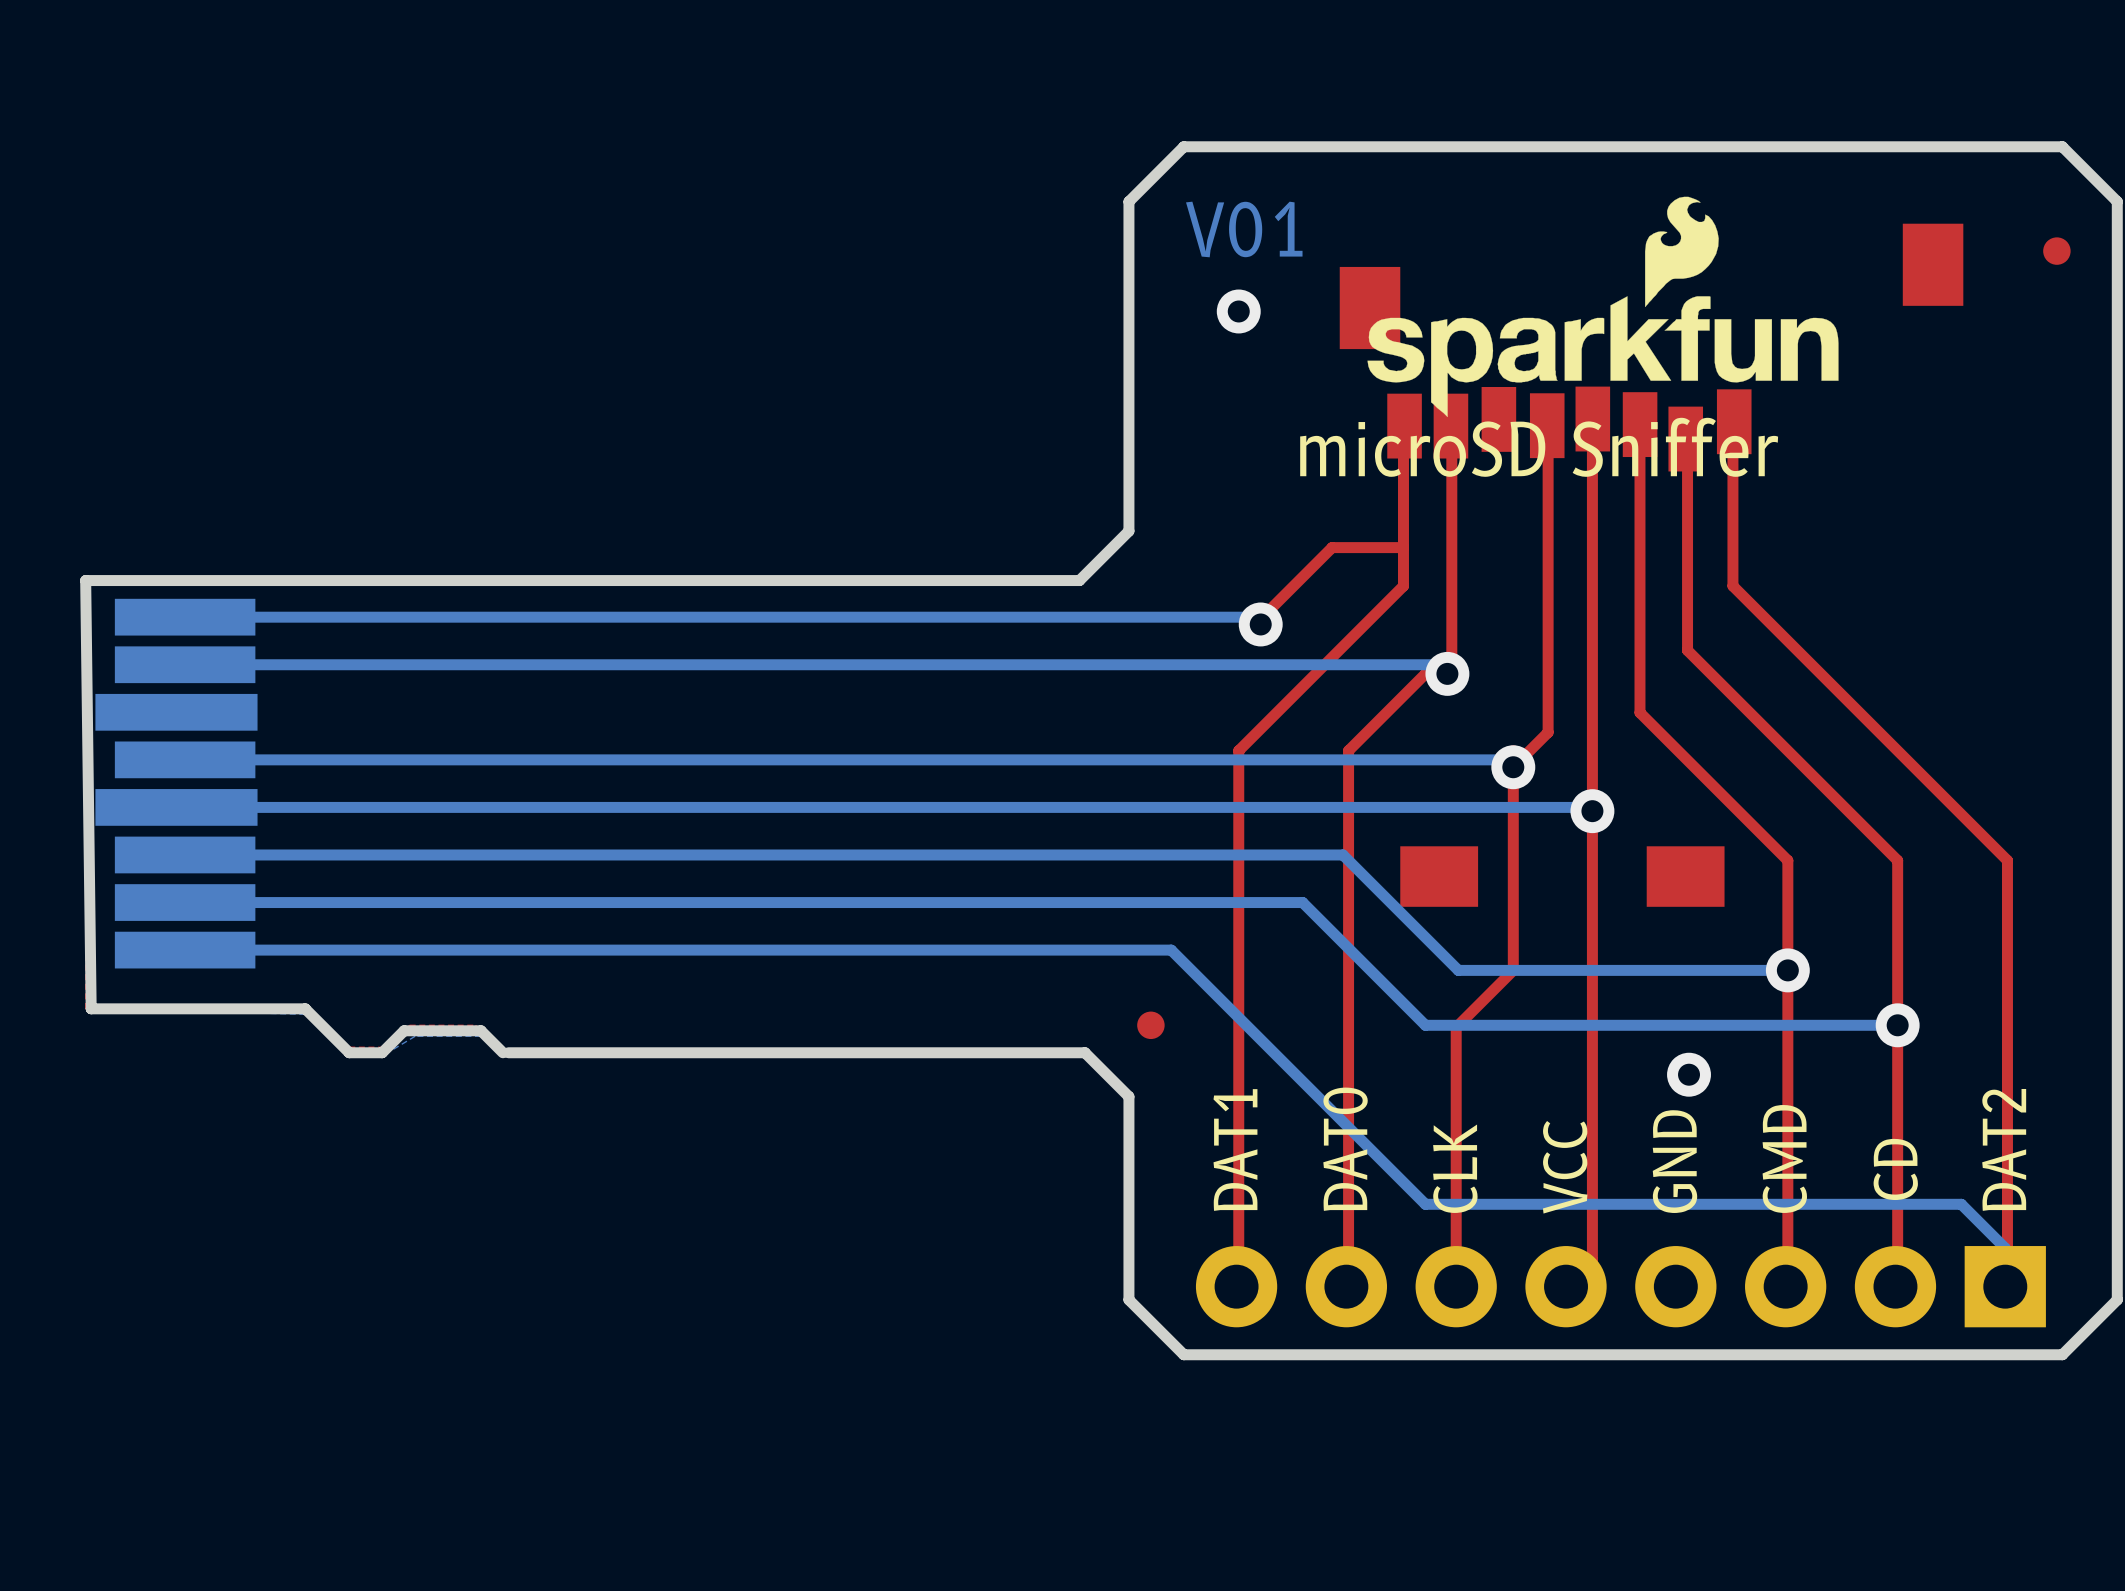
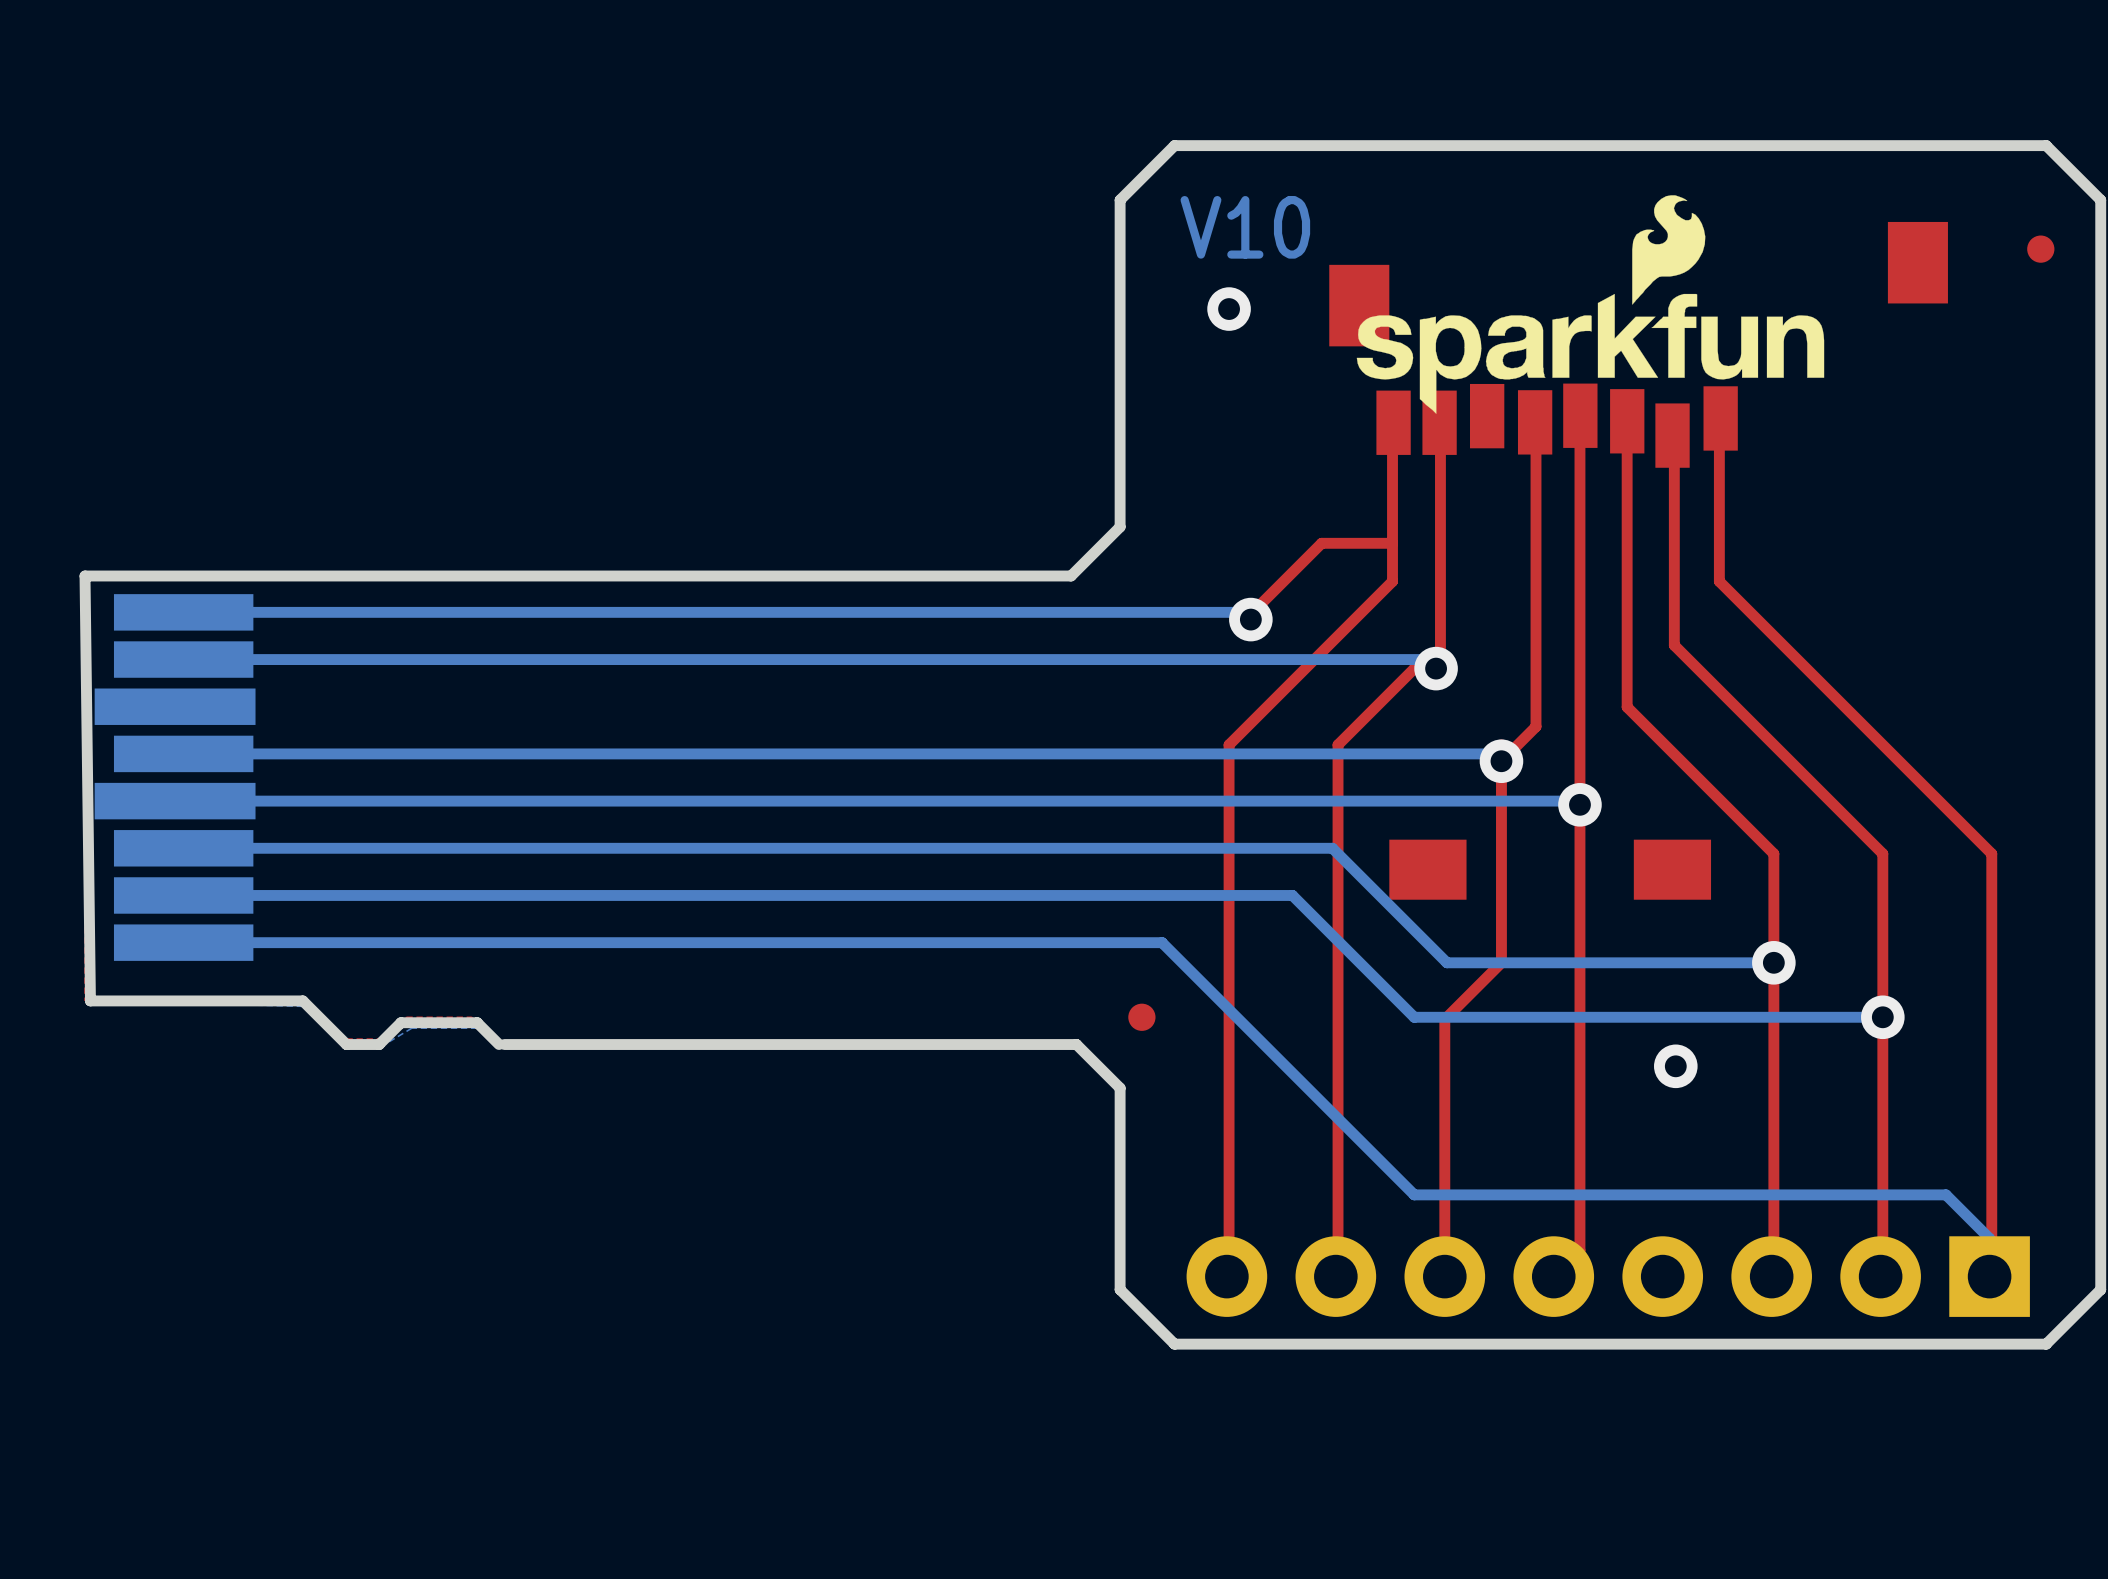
text: V01 (1244, 229) -> V10 (1245, 227)
text: microSD Sniffer (1539, 447) -> none
text: DAT0 (1345, 1149) -> none
text: DAT2 (2004, 1149) -> none
text: DAT1 (1235, 1150) -> none
text: CMD (1784, 1158) -> none
text: GND (1674, 1161) -> none
text: VCC (1565, 1167) -> none
text: CLK (1455, 1168) -> none
text: CD (1895, 1169) -> none

